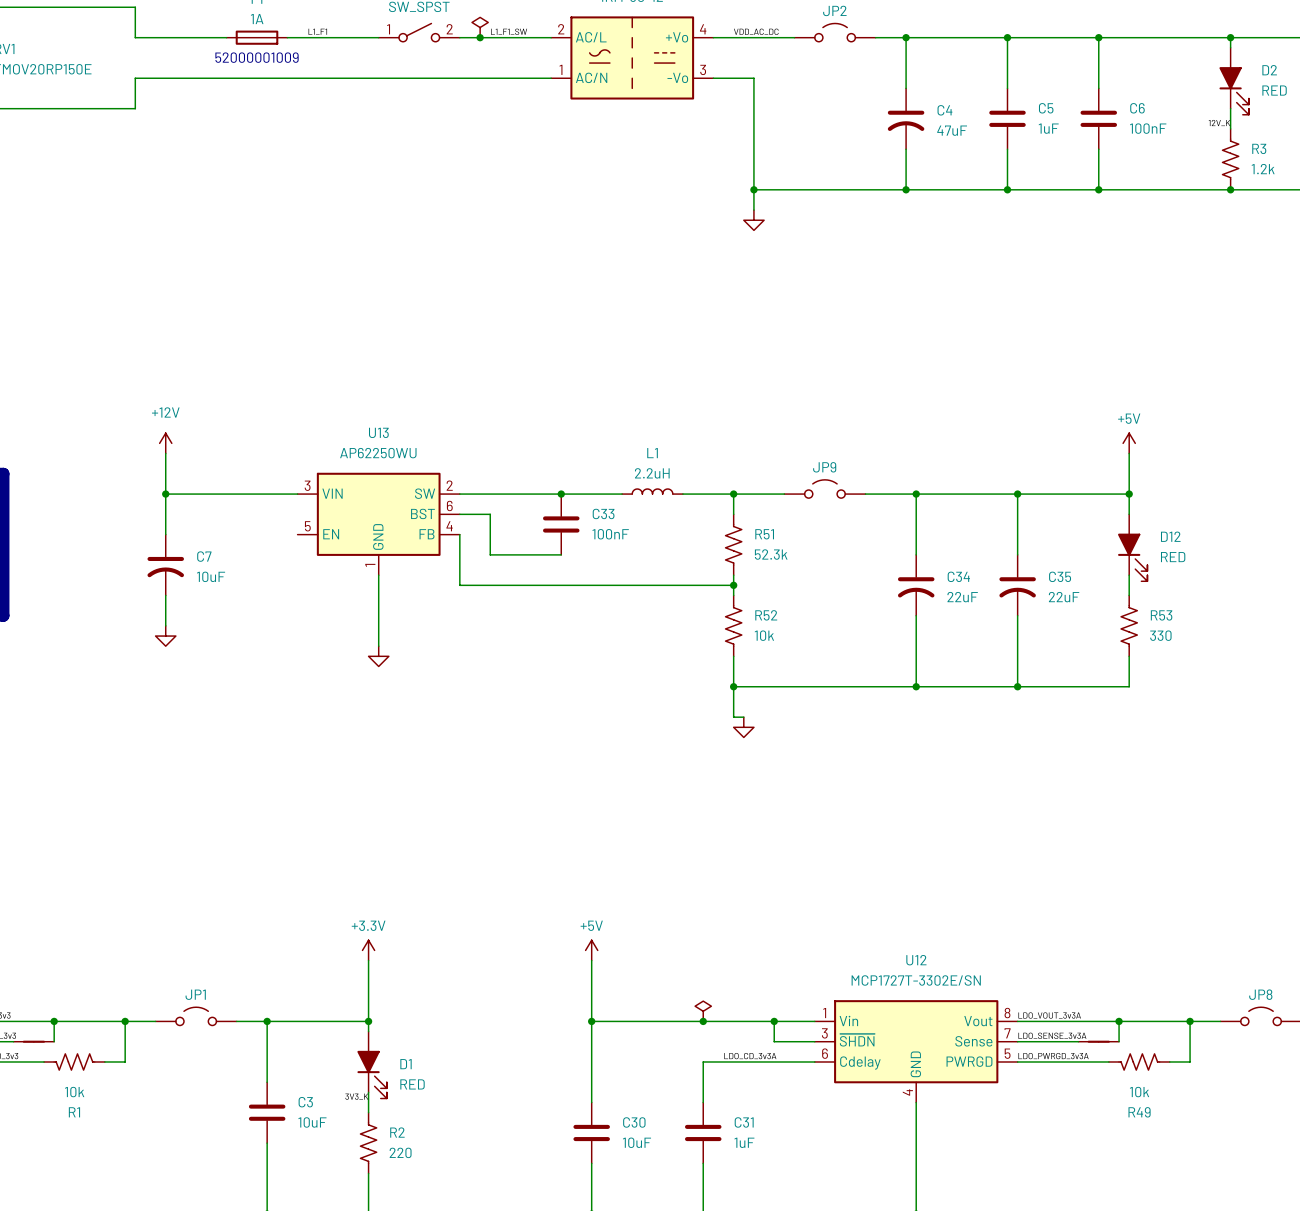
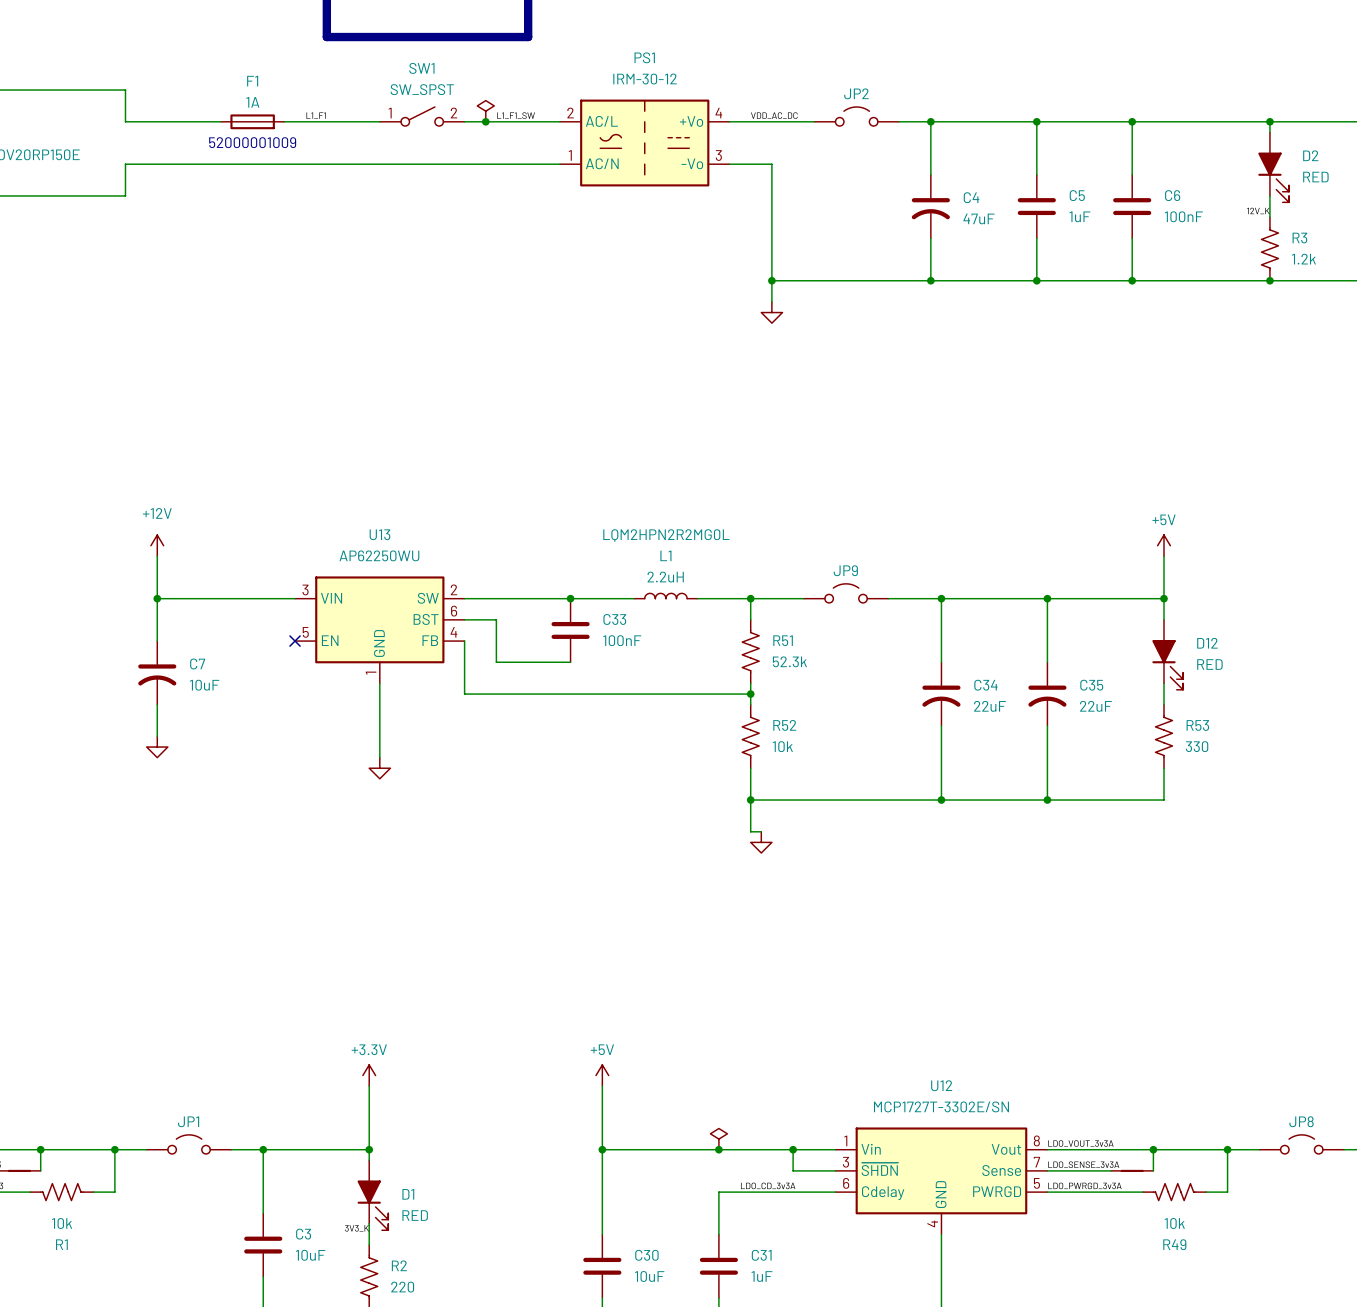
L1 text: none -> LQM2HPN2R2MG0L (666, 535)
no-connect mark: none -> (295, 641)

